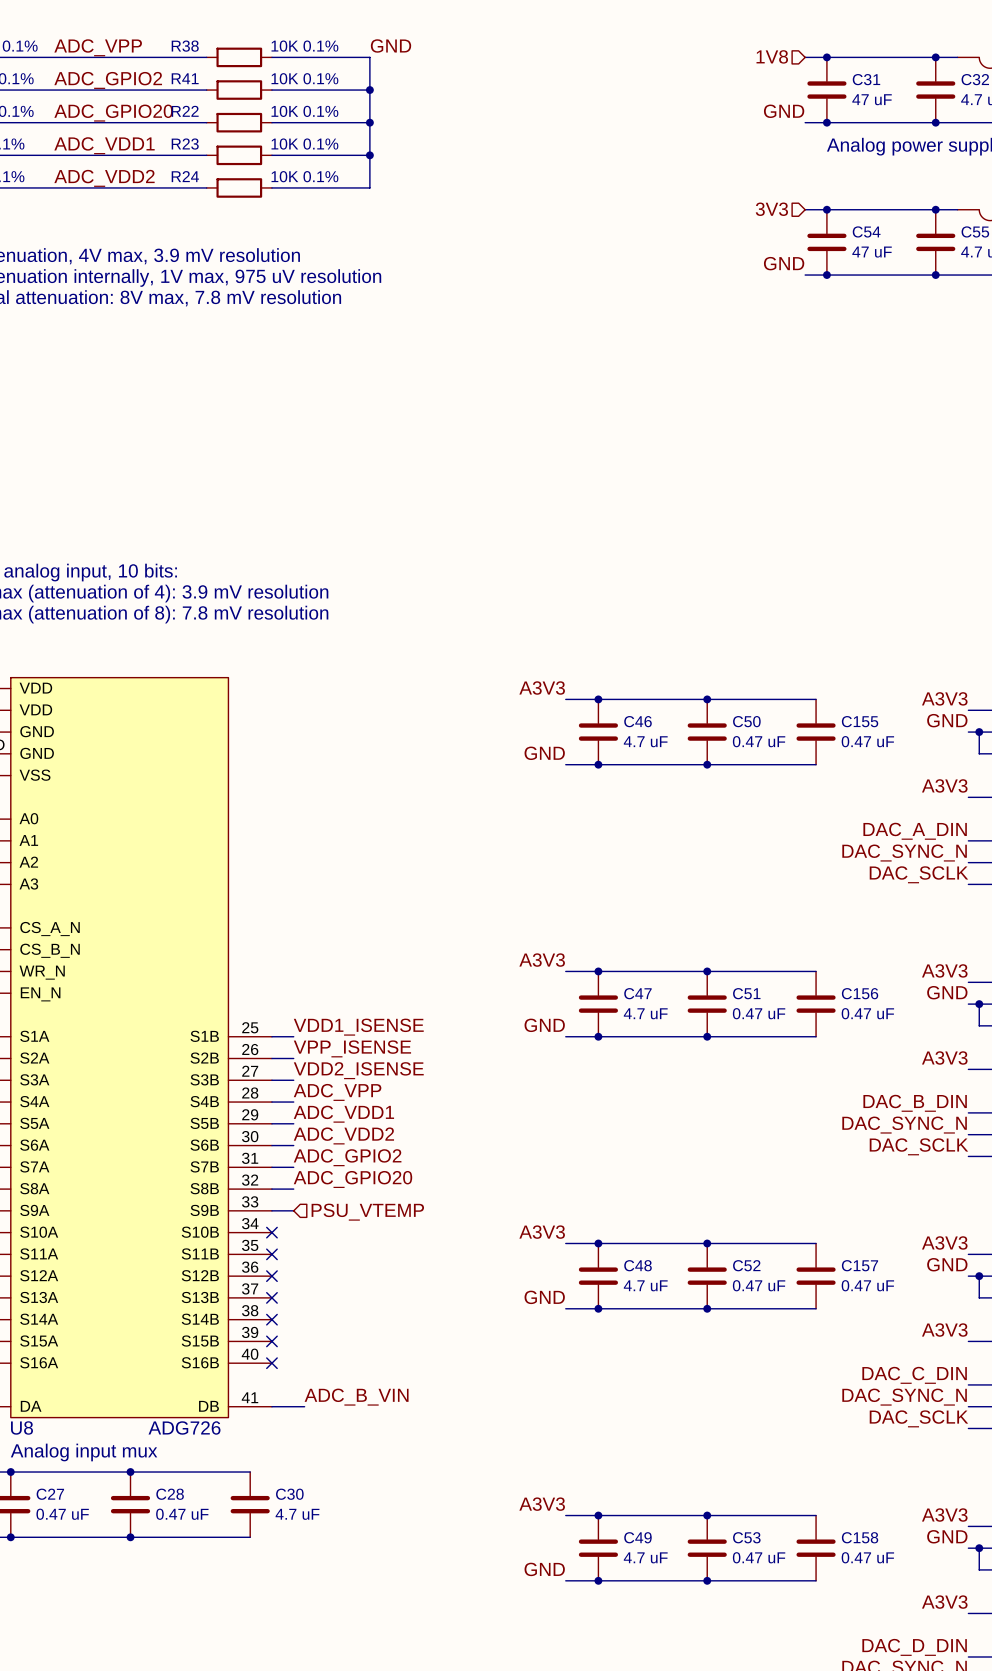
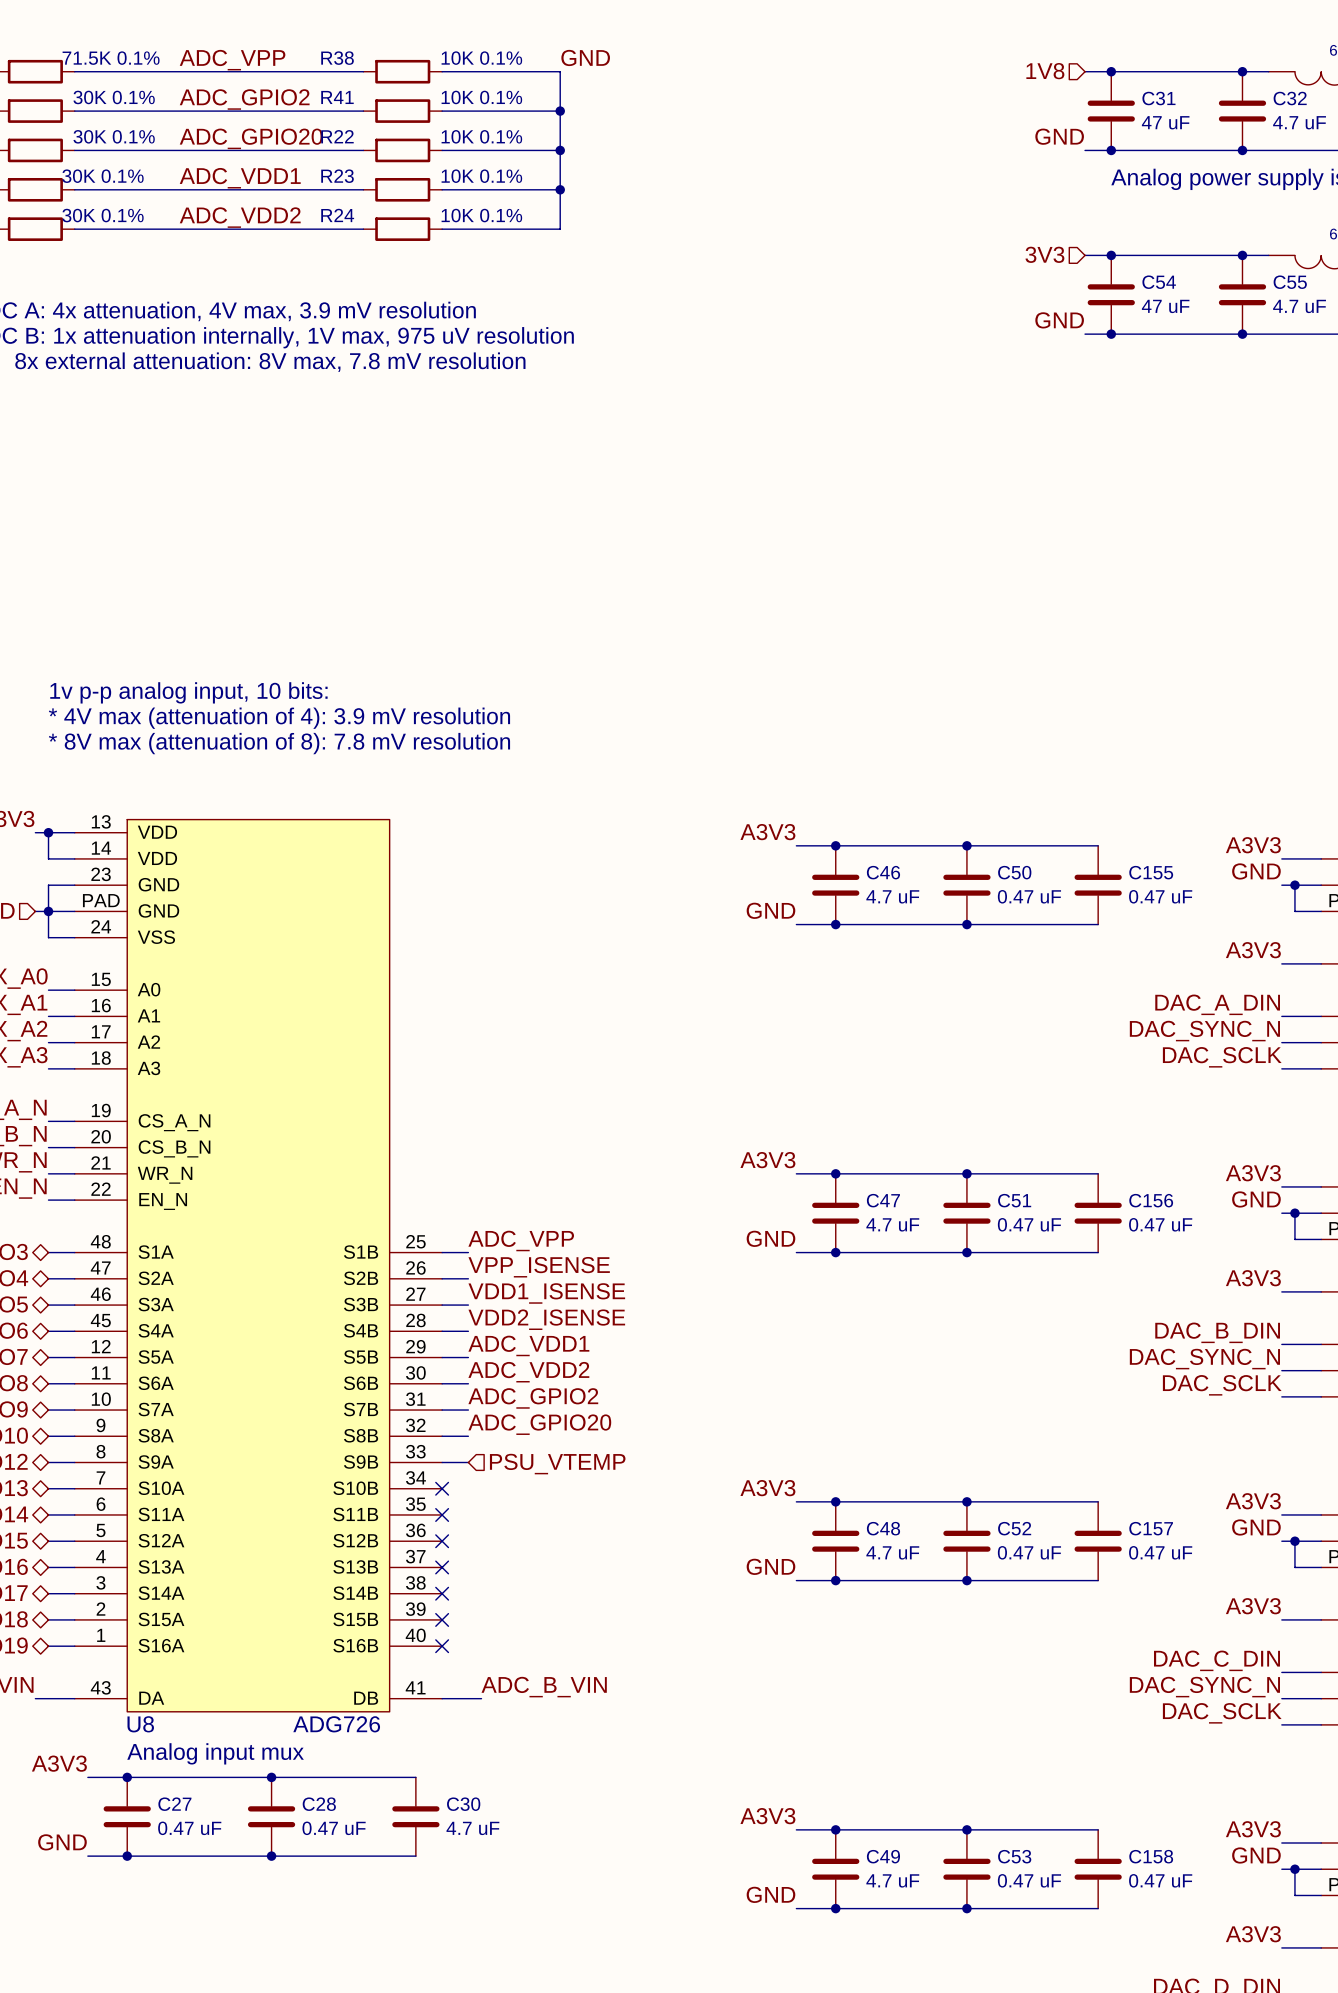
label: VDD1_ISENSE (358, 1027) -> ADC_VPP (521, 1240)
label: VDD2_ISENSE (358, 1070) -> VDD1_ISENSE (546, 1293)
label: ADC_VPP (337, 1092) -> VDD2_ISENSE (546, 1319)

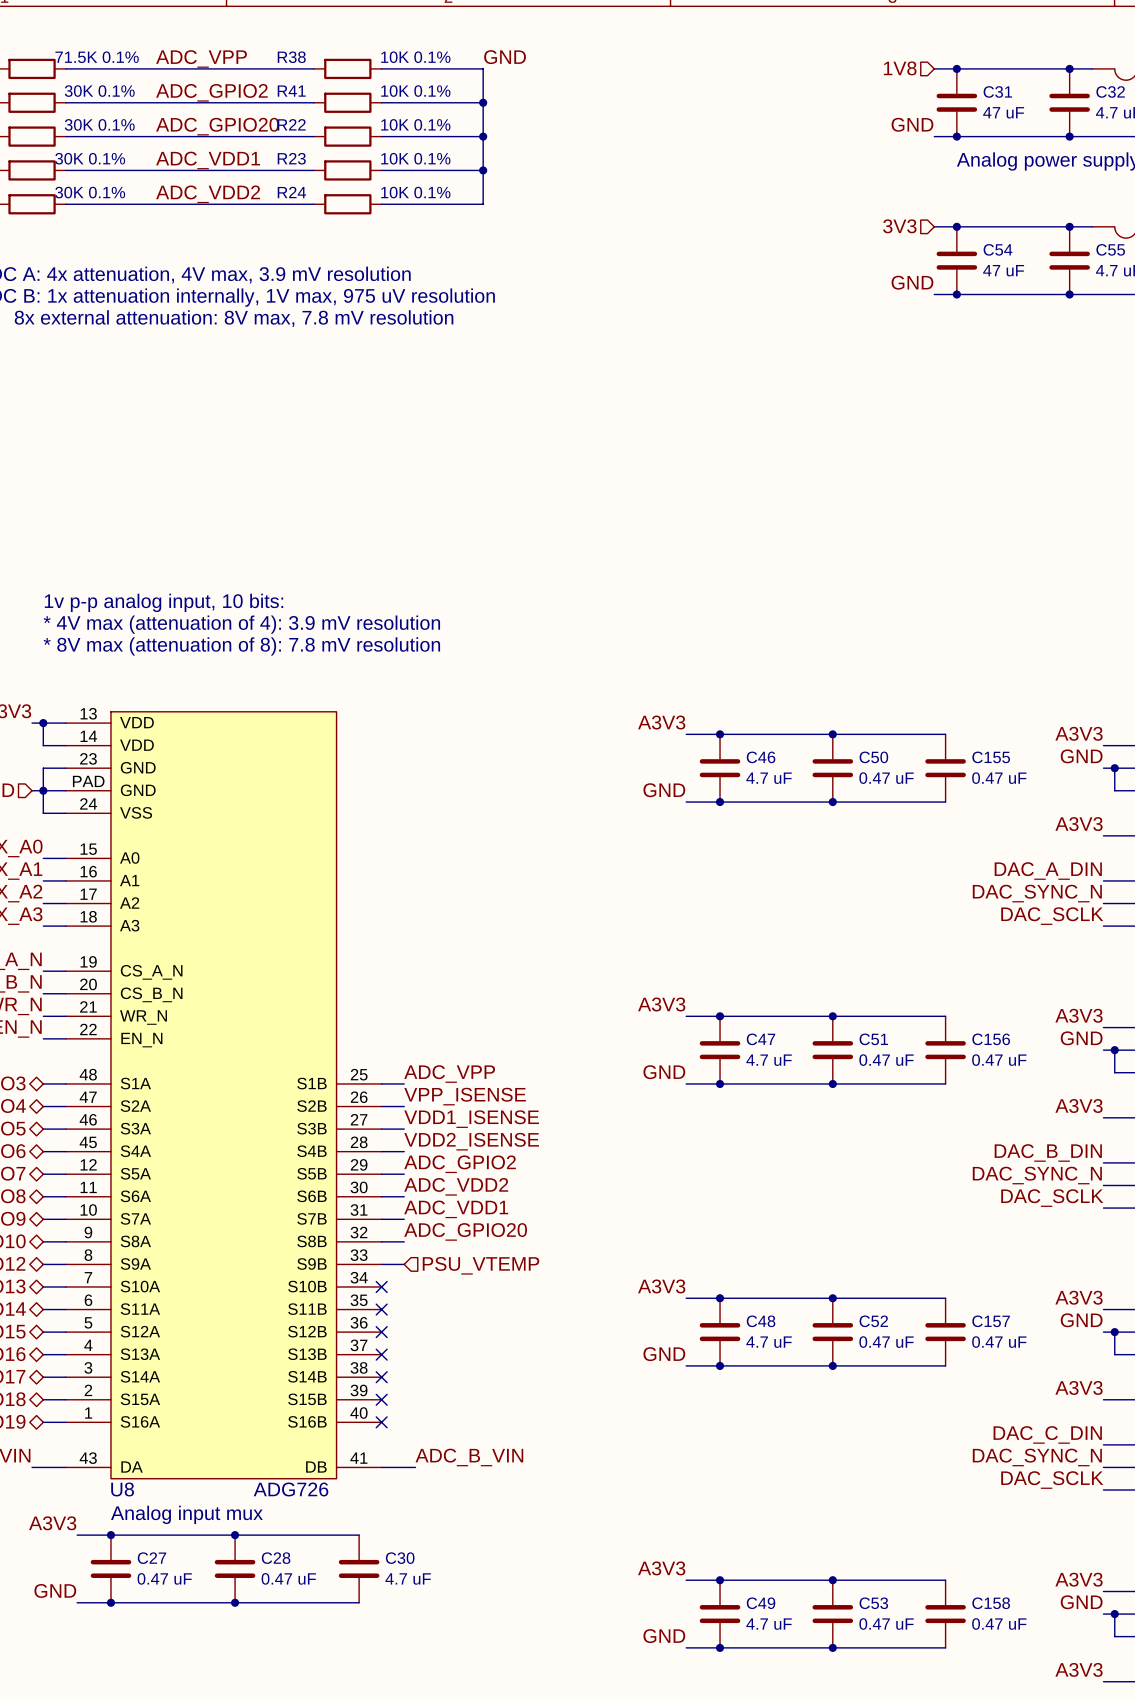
label: ADC_VDD1 (528, 1345) -> ADC_GPIO2 (460, 1164)
label: ADC_GPIO2 (533, 1398) -> ADC_VDD1 (456, 1209)

